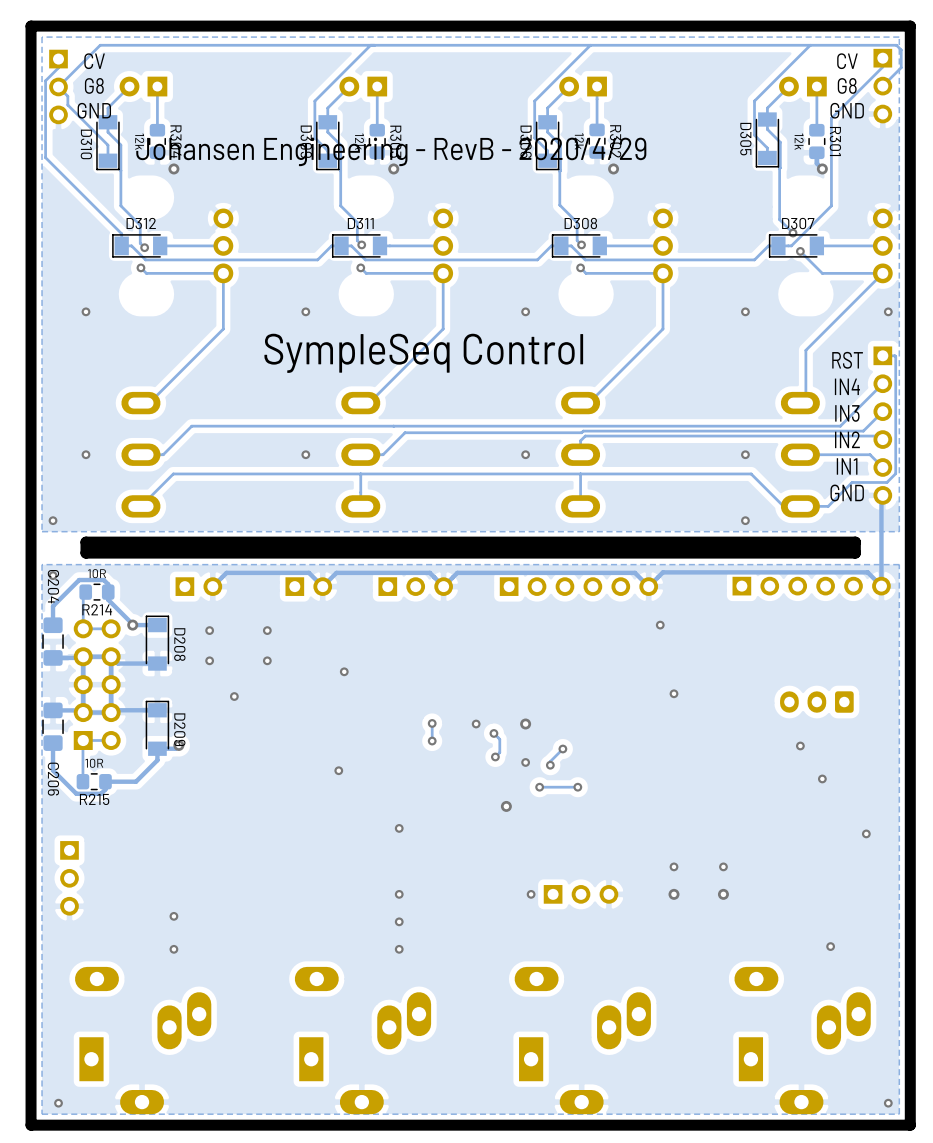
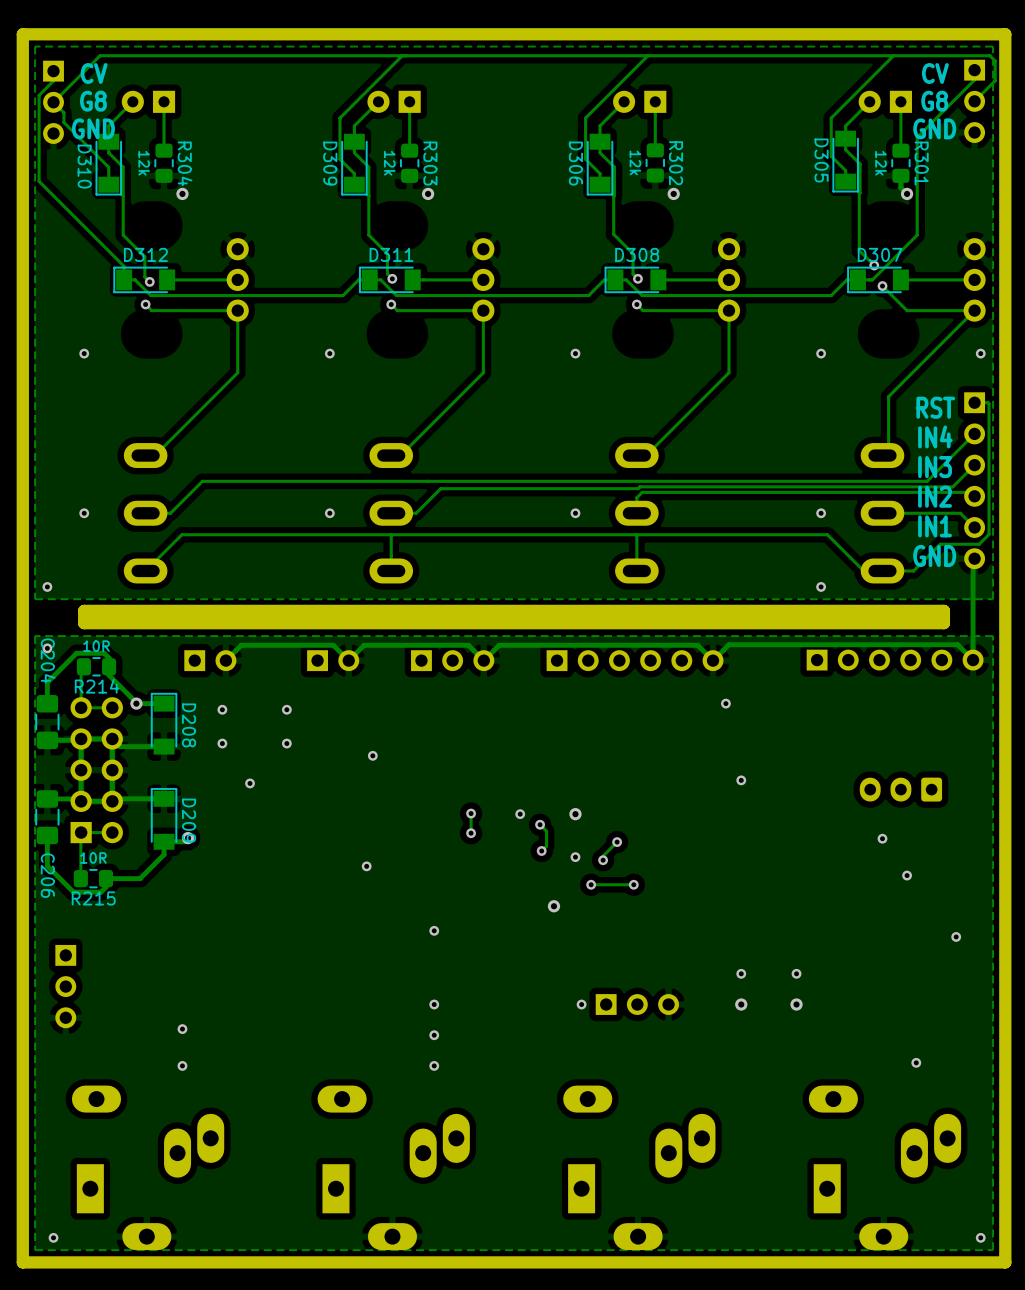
text: Johansen Engineering - RevB - 2020/4/29 (391, 151) -> none
text: SympleSeq Control (423, 353) -> none

